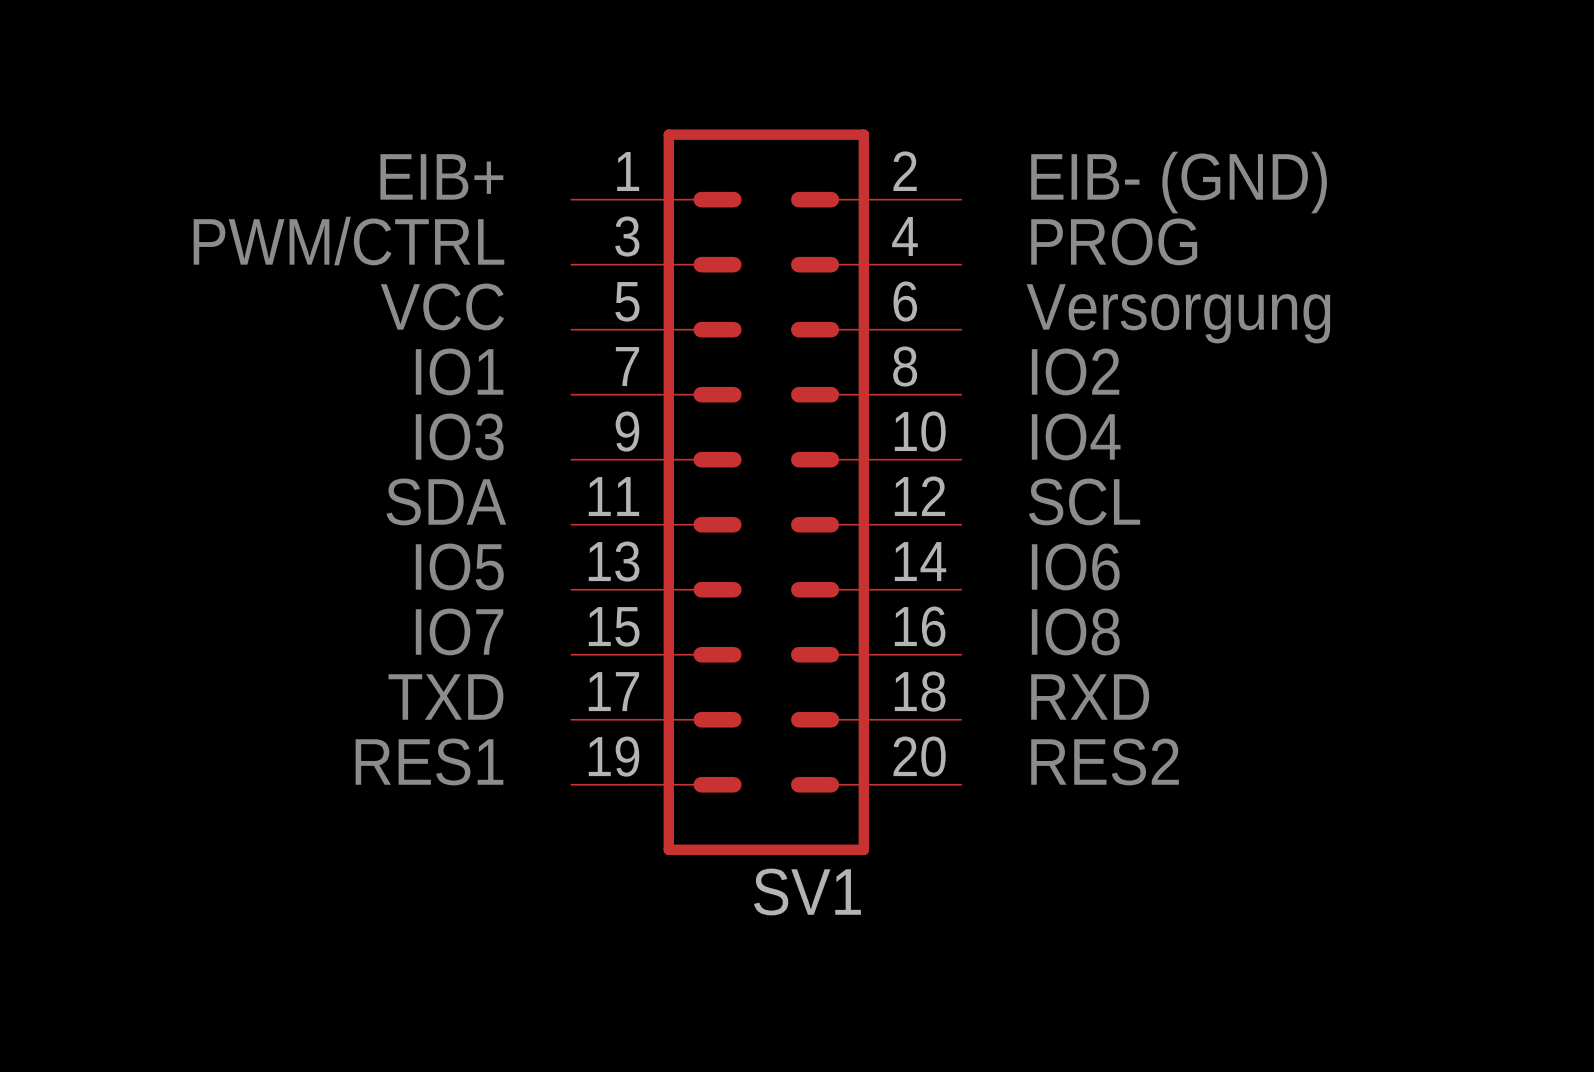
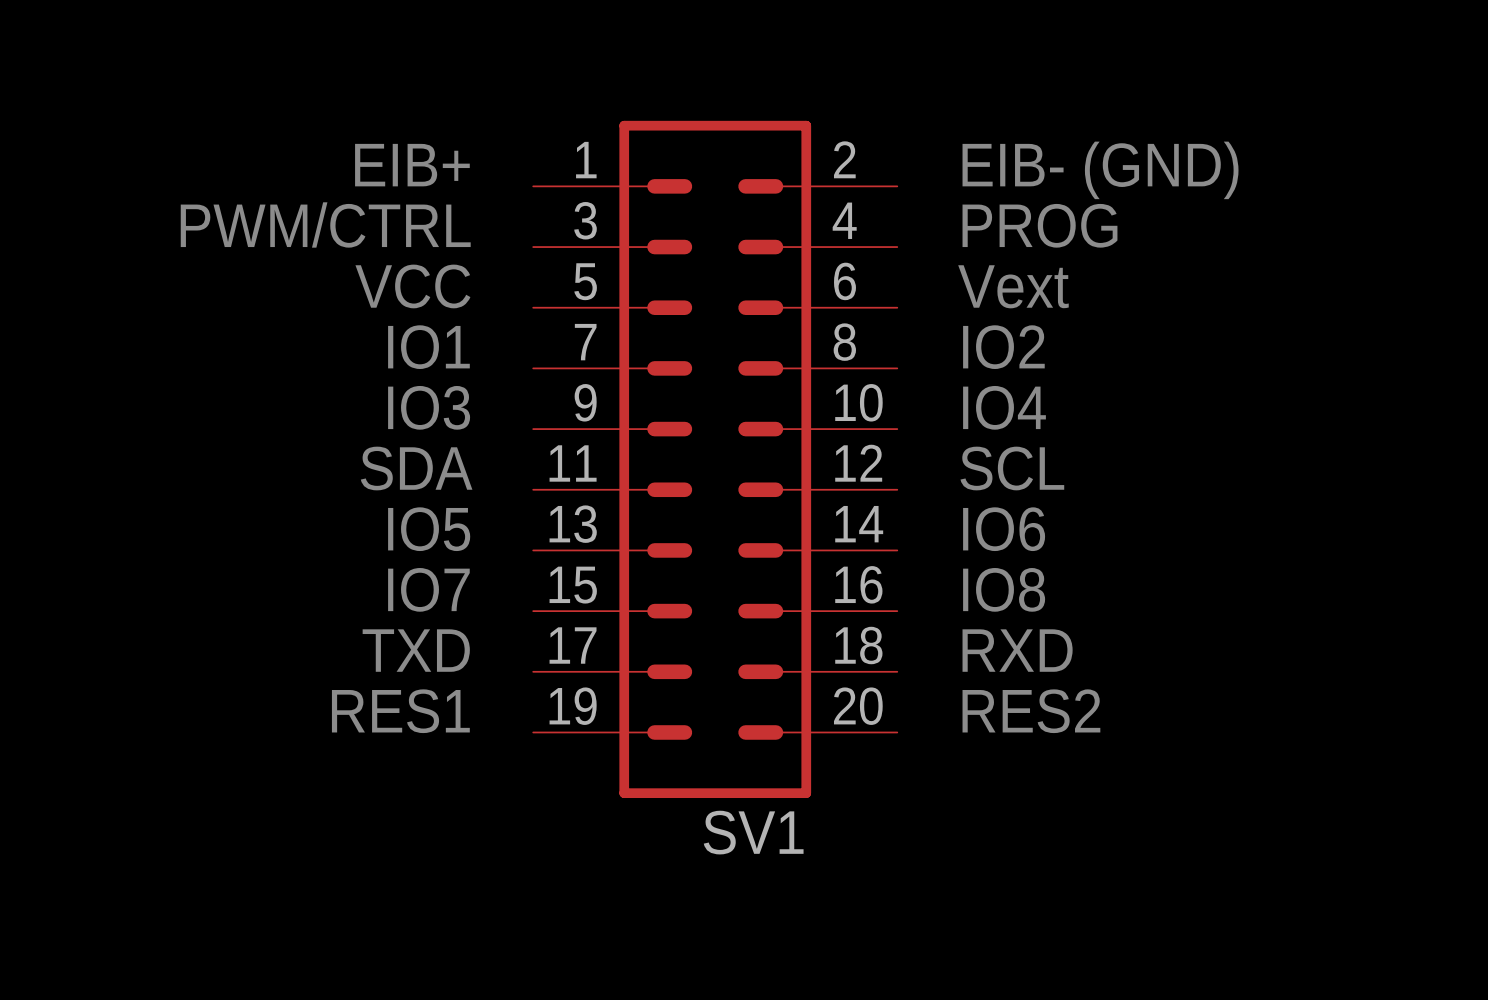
text: Versorgung (1178, 313) -> Vext (1013, 286)

